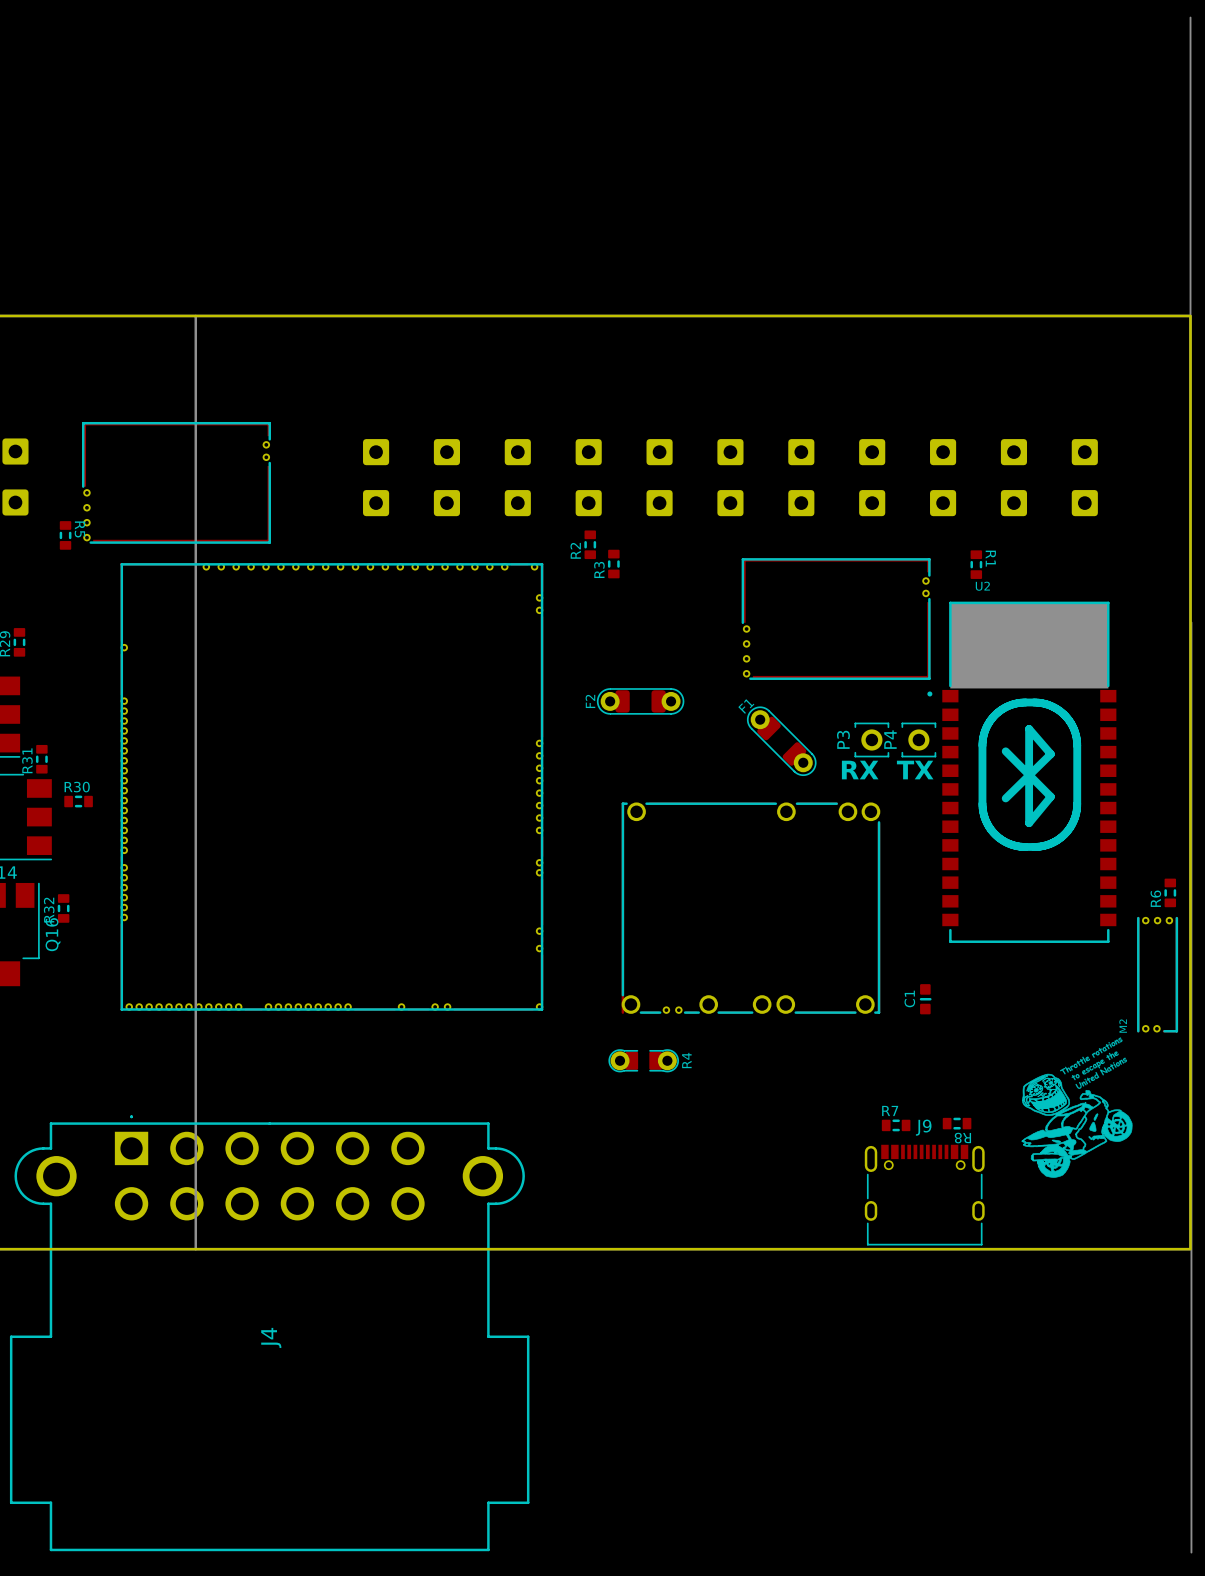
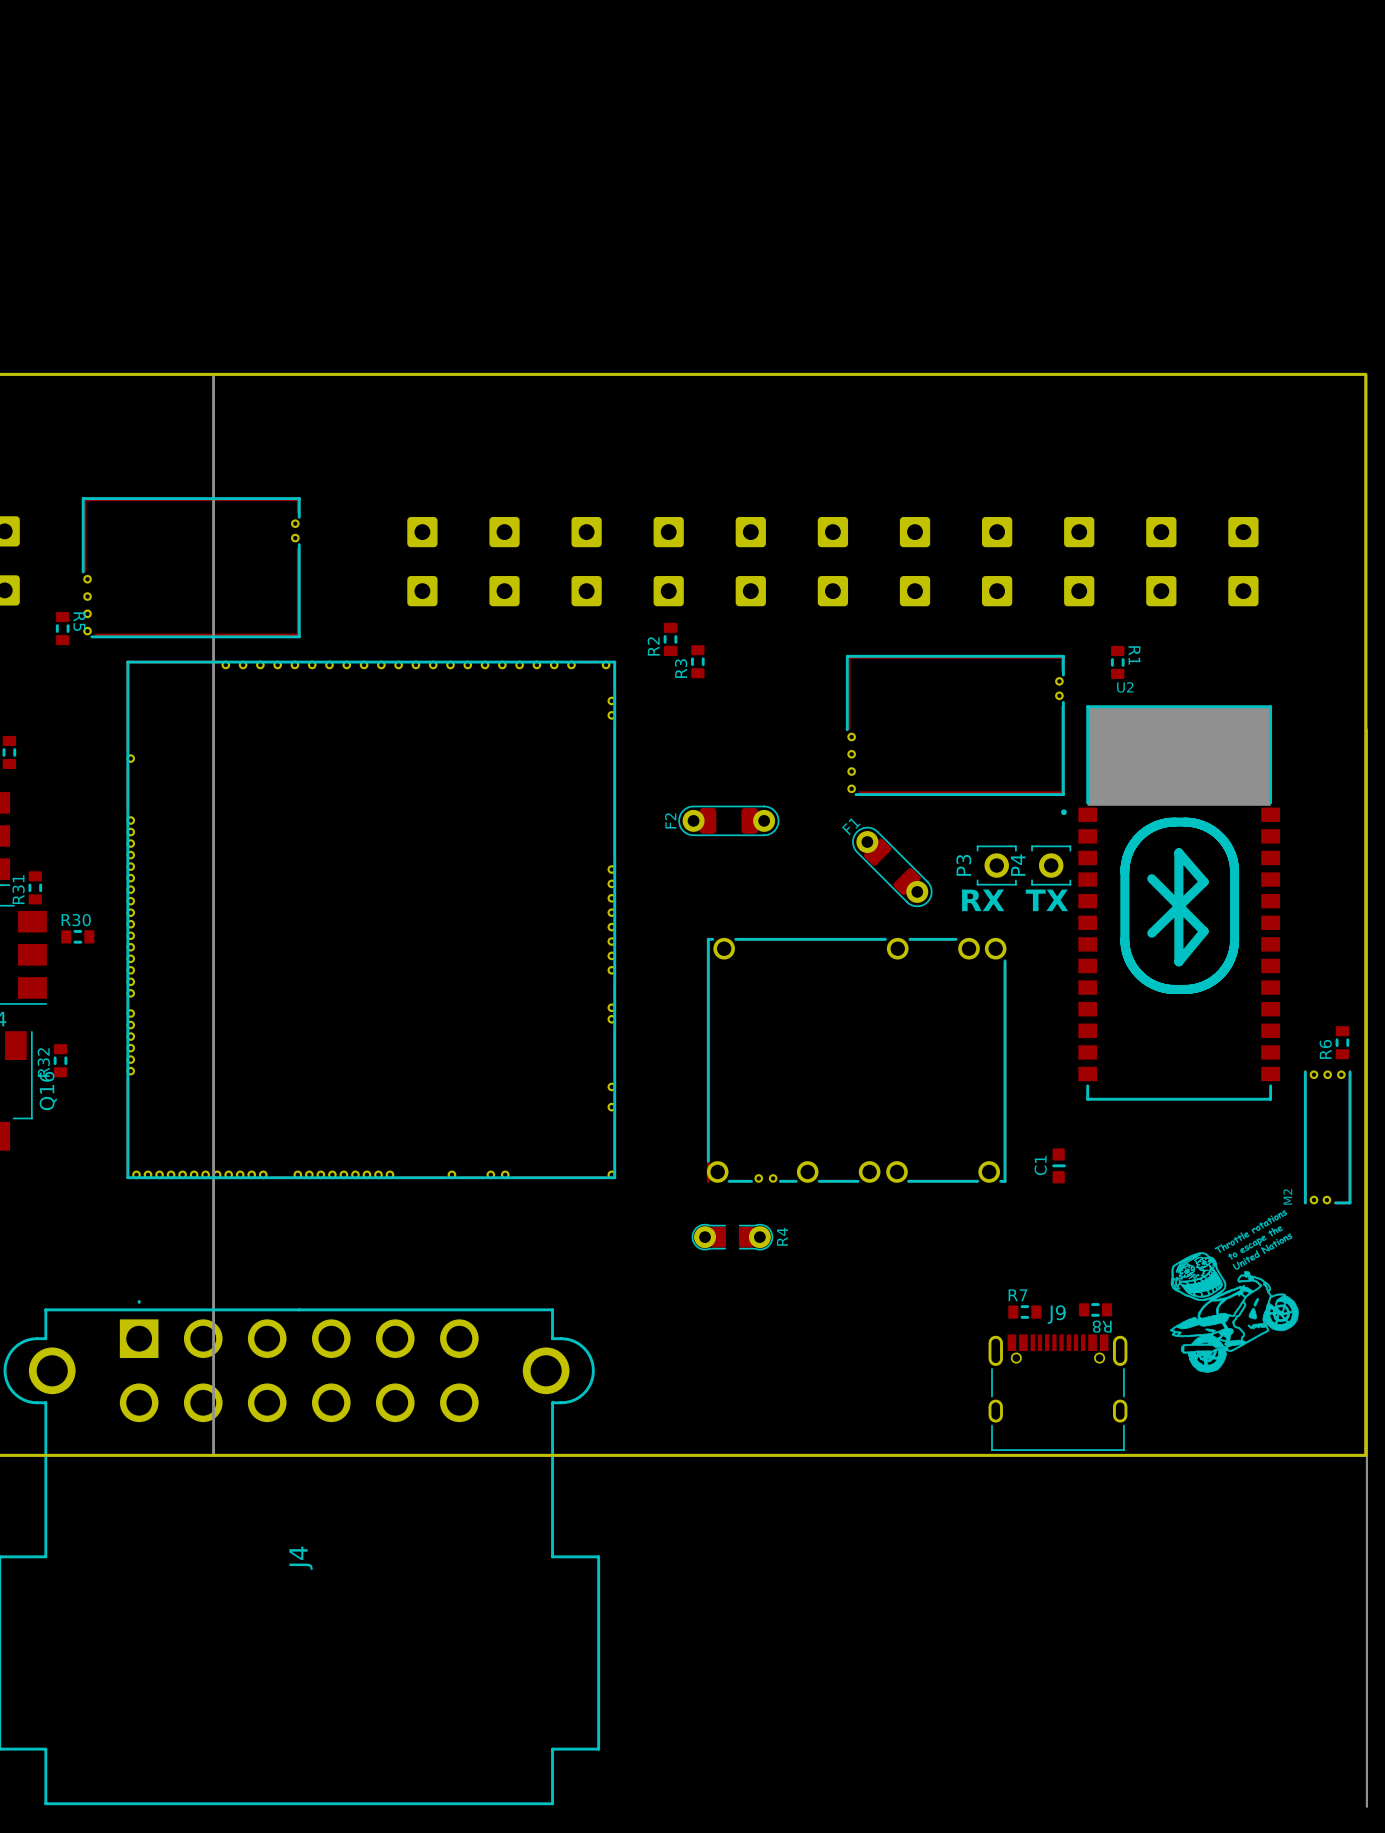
line: (1190, 17) (1190, 315) -> none

